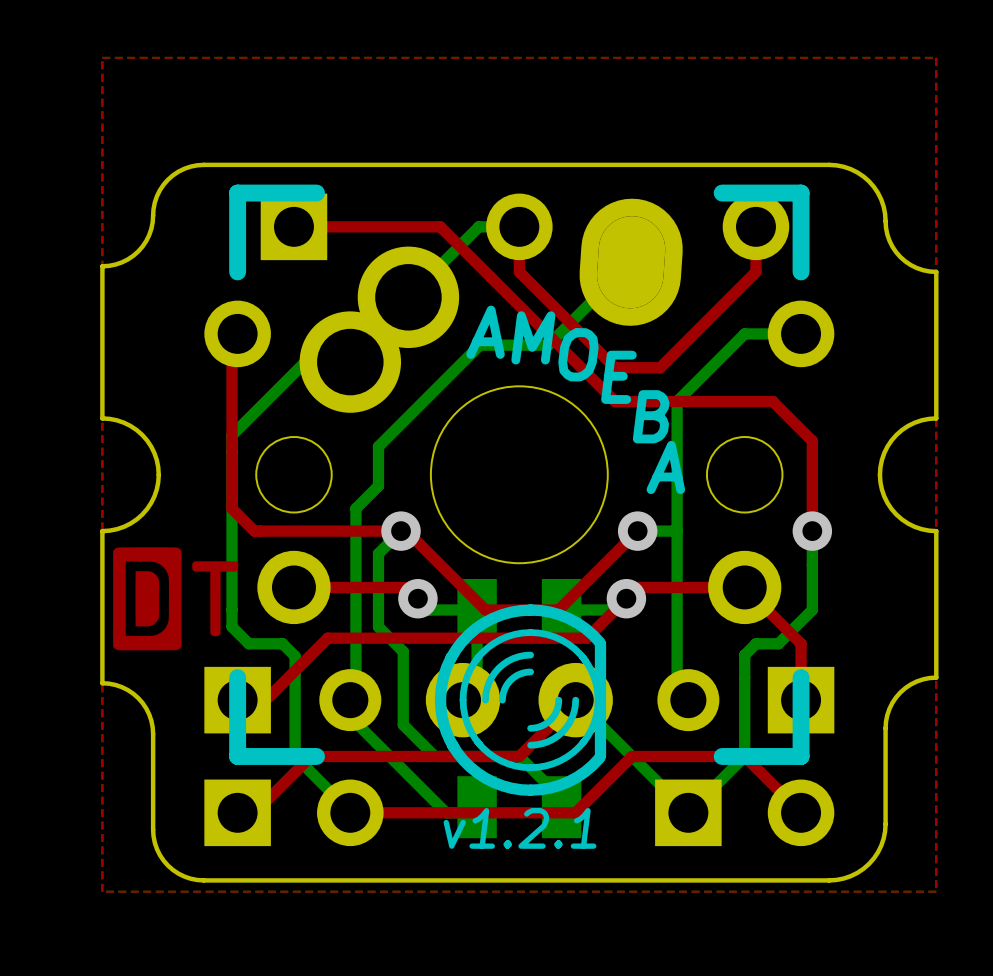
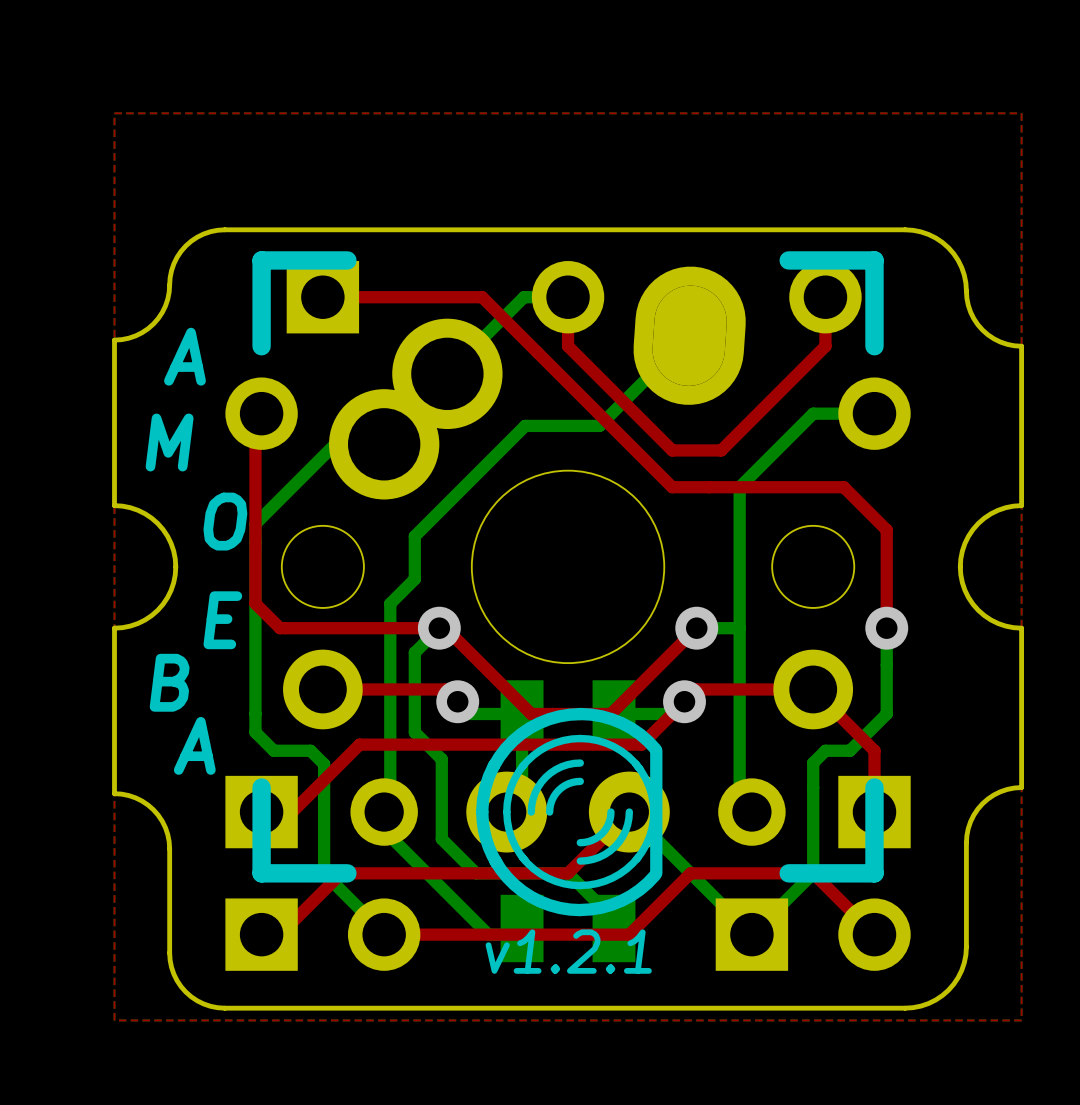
text: none -> A (184, 356)
text: A (485, 332) -> none
text position: M (533, 337) -> M (169, 442)
text position: O (578, 354) -> O (225, 521)
text position: E (618, 377) -> E (222, 620)
text position: B (651, 416) -> B (169, 682)
text: A (665, 467) -> none
drawing: [113, 547, 239, 651] -> none
text: none -> A (194, 745)

